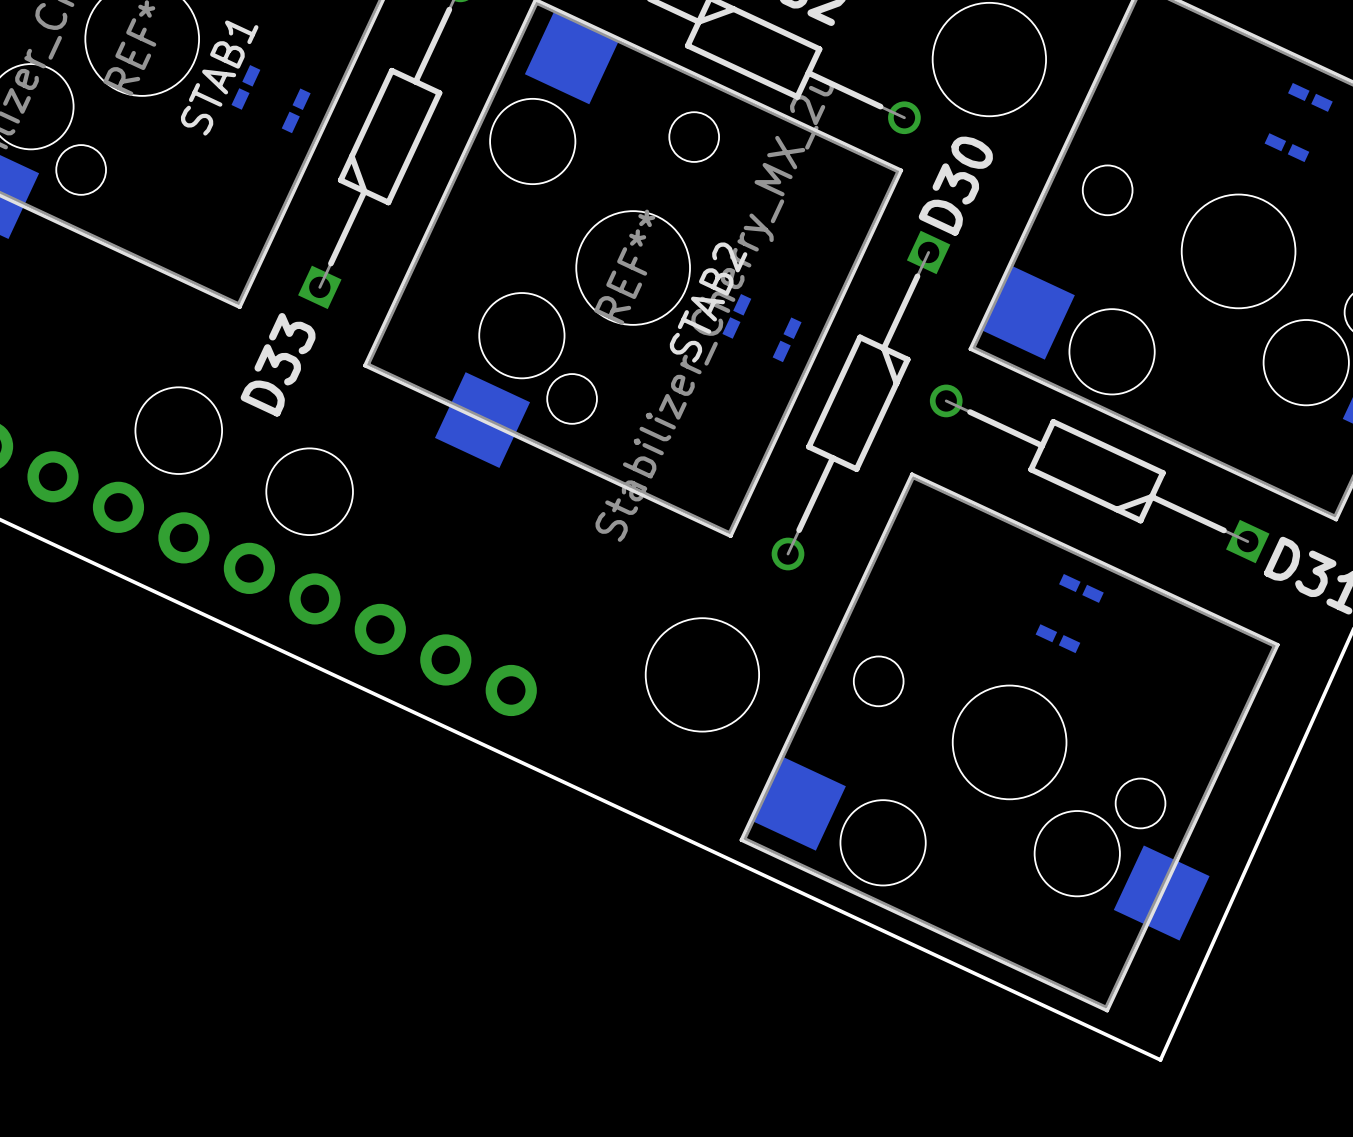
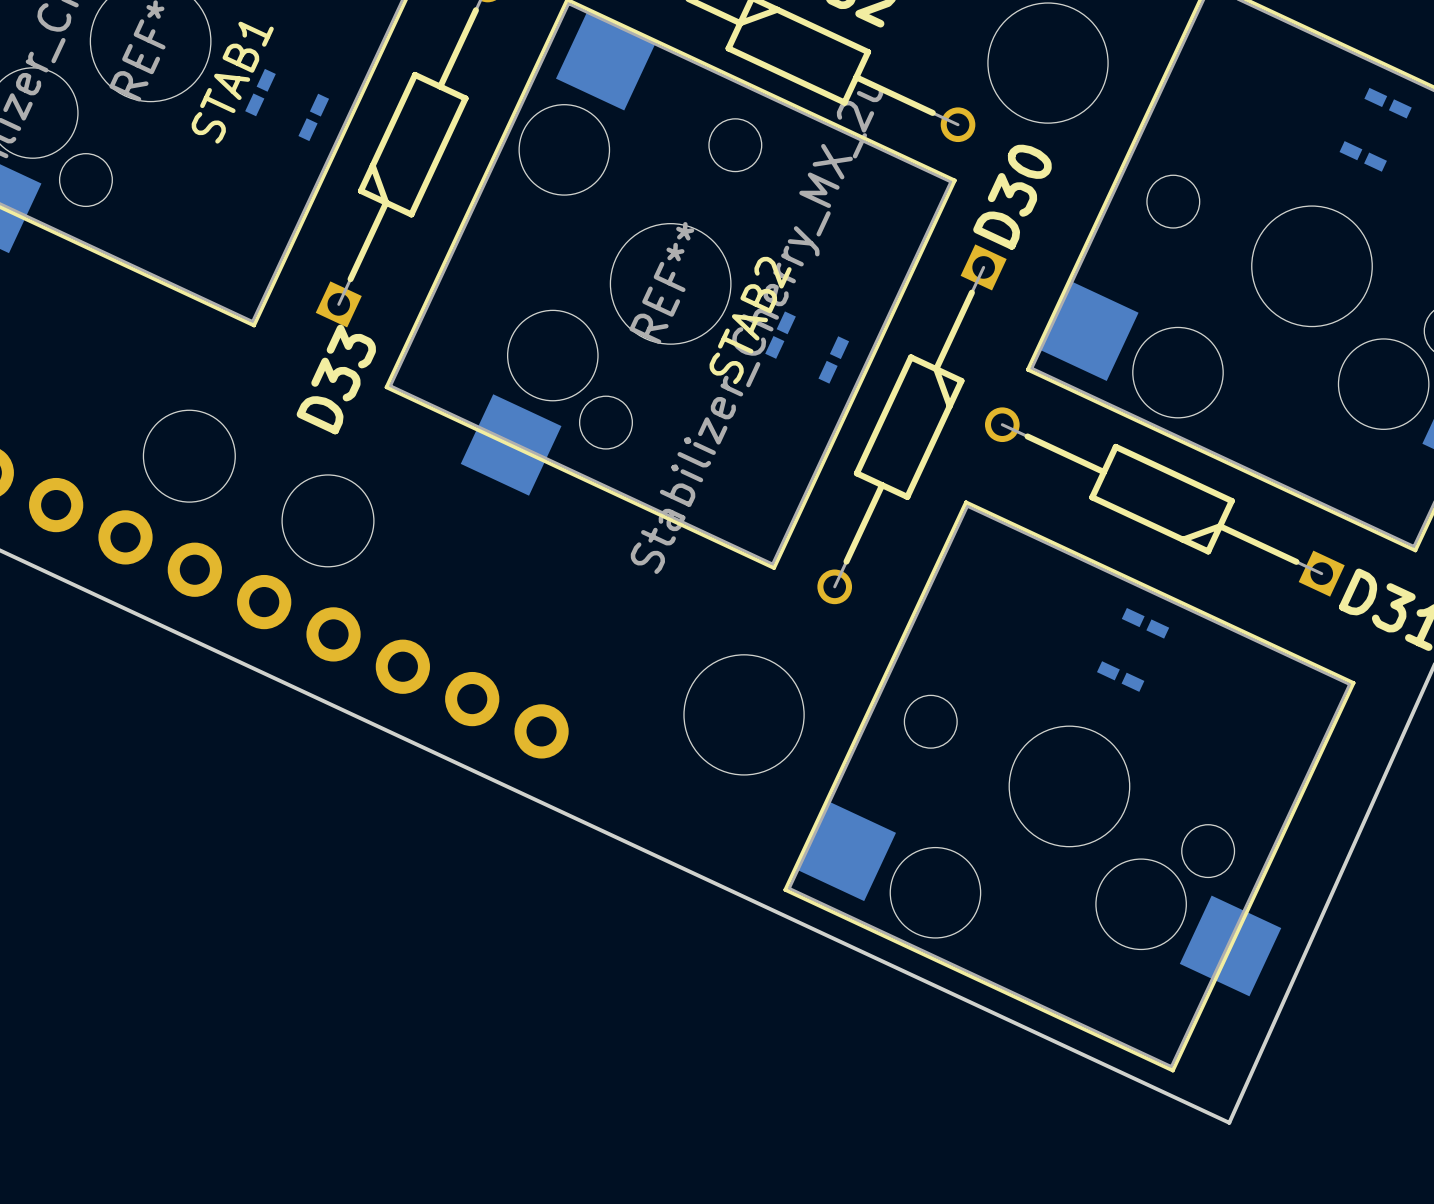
D33 name position: D33 (278, 364) -> D33 (336, 379)

